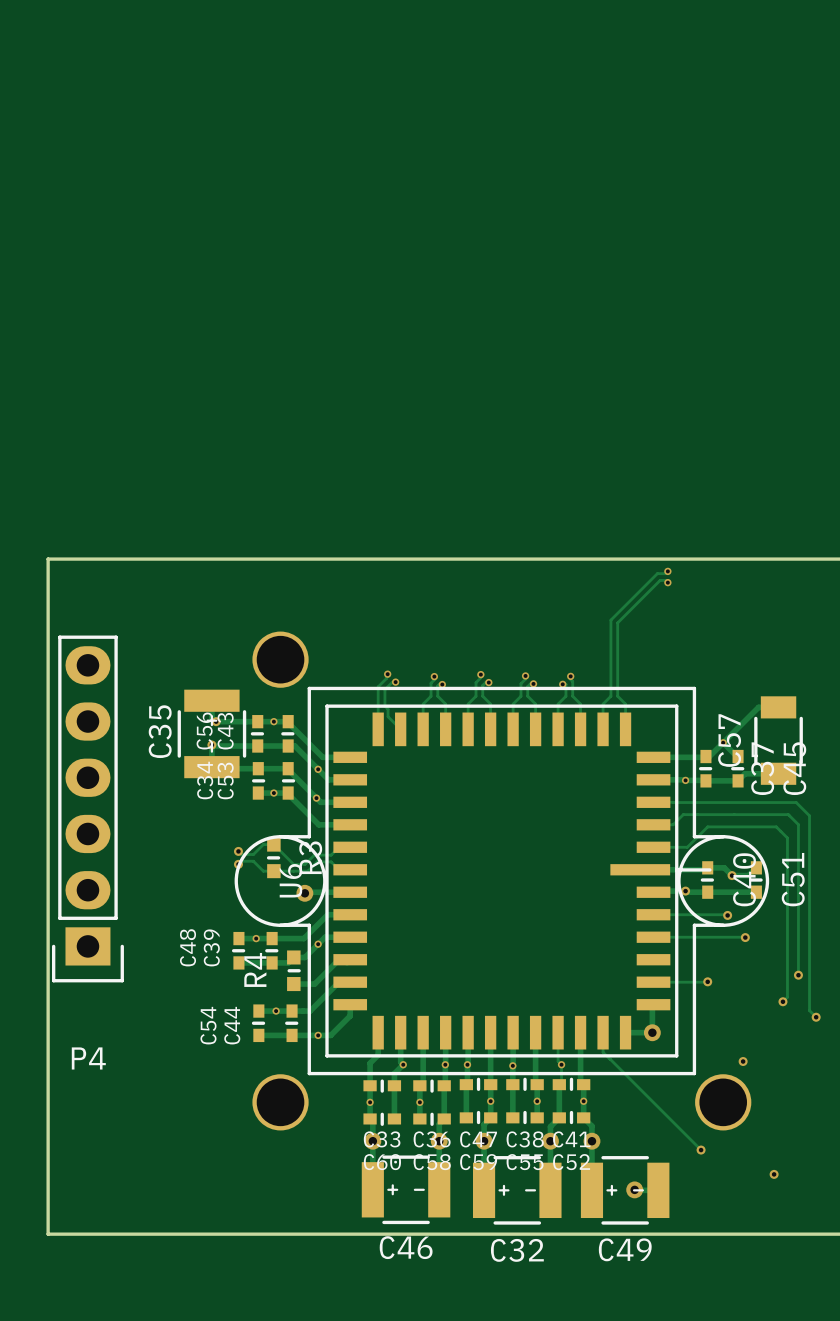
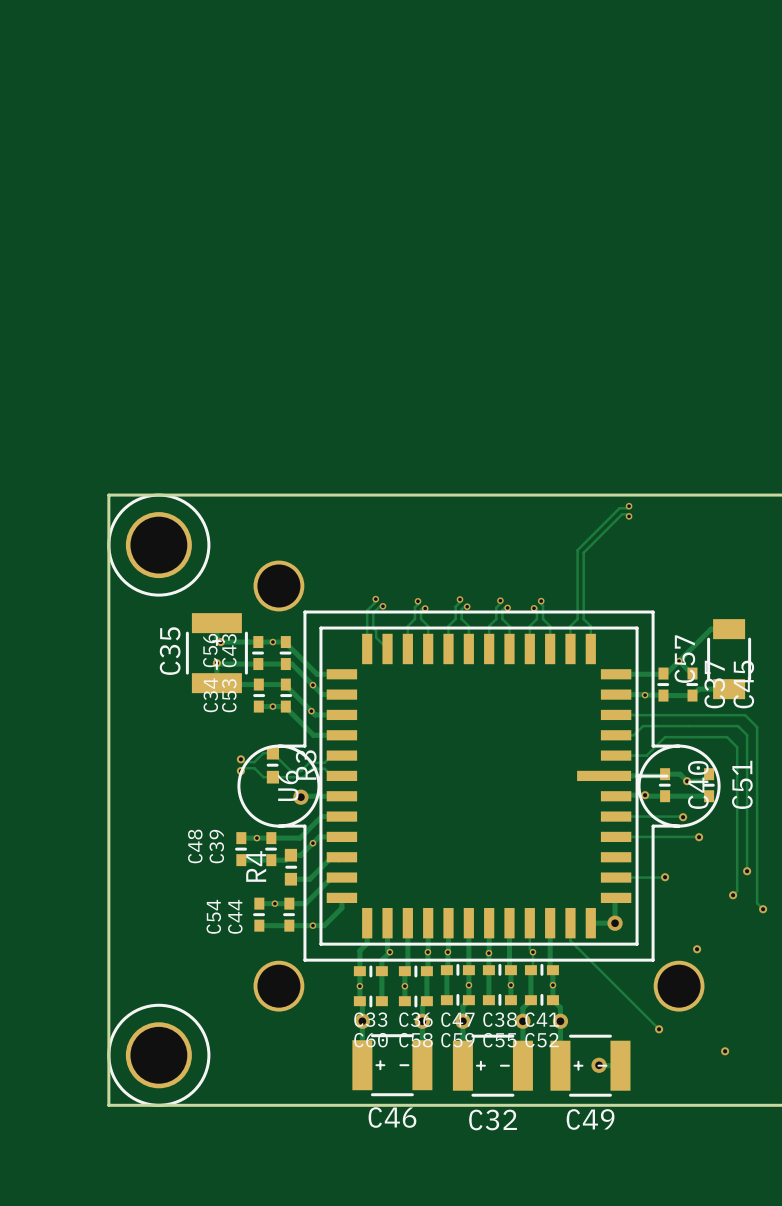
board edge: (92, 559) (48, 559) (48, 1234) (92, 1234) -> (108, 495) (108, 1105)
part: none -> (158, 545)
P4: (87, 808) -> none
part: none -> (158, 1055)

